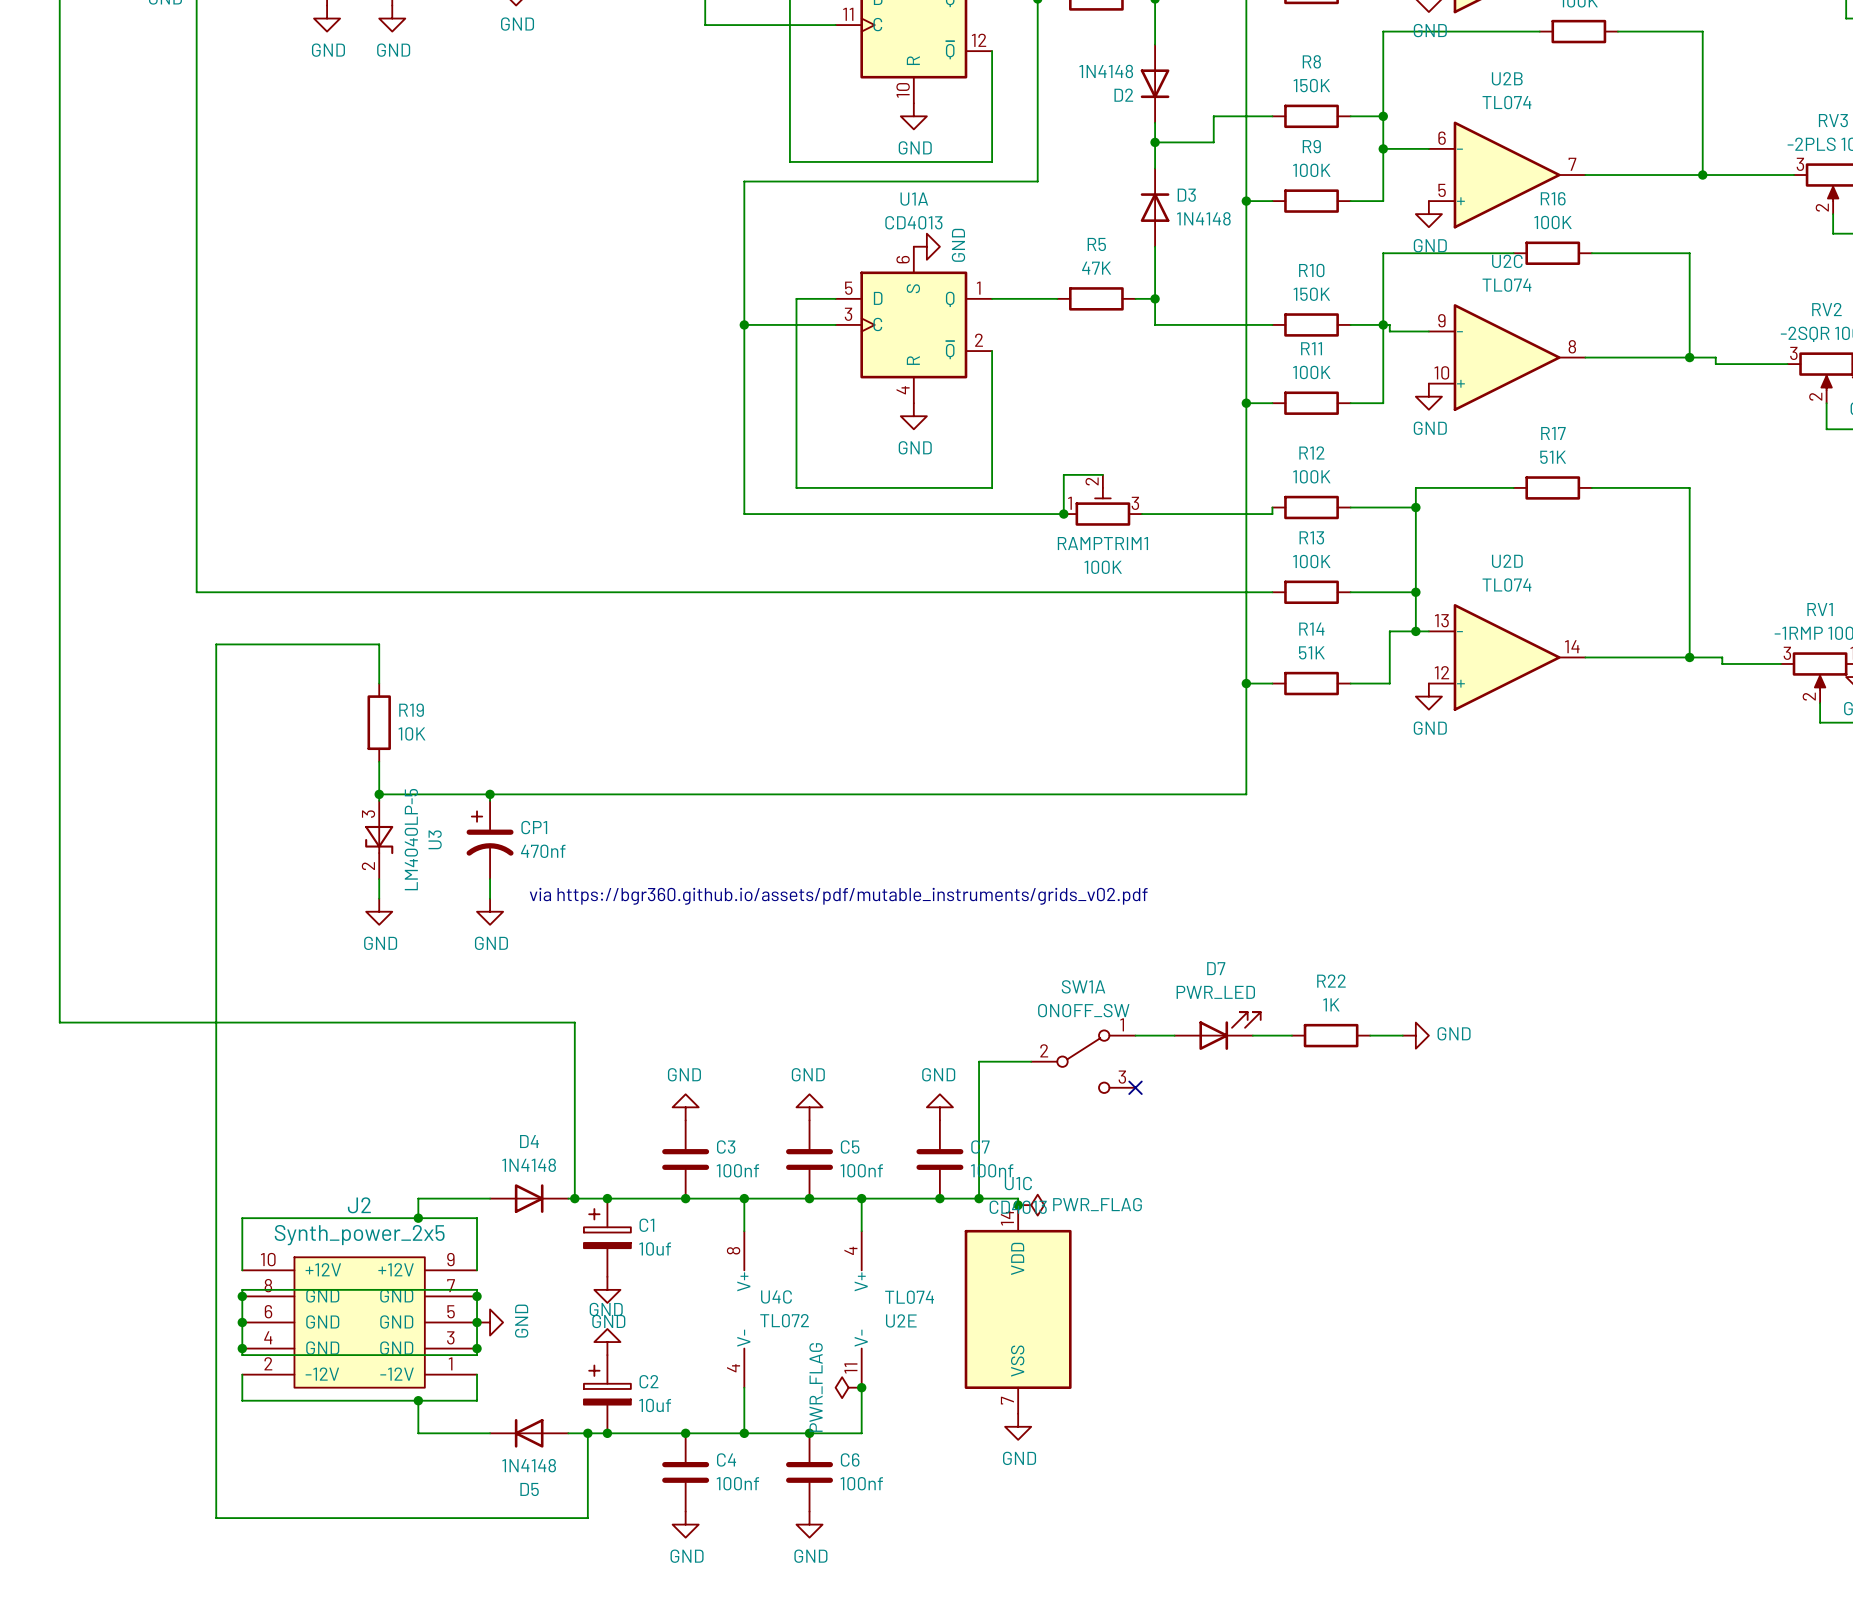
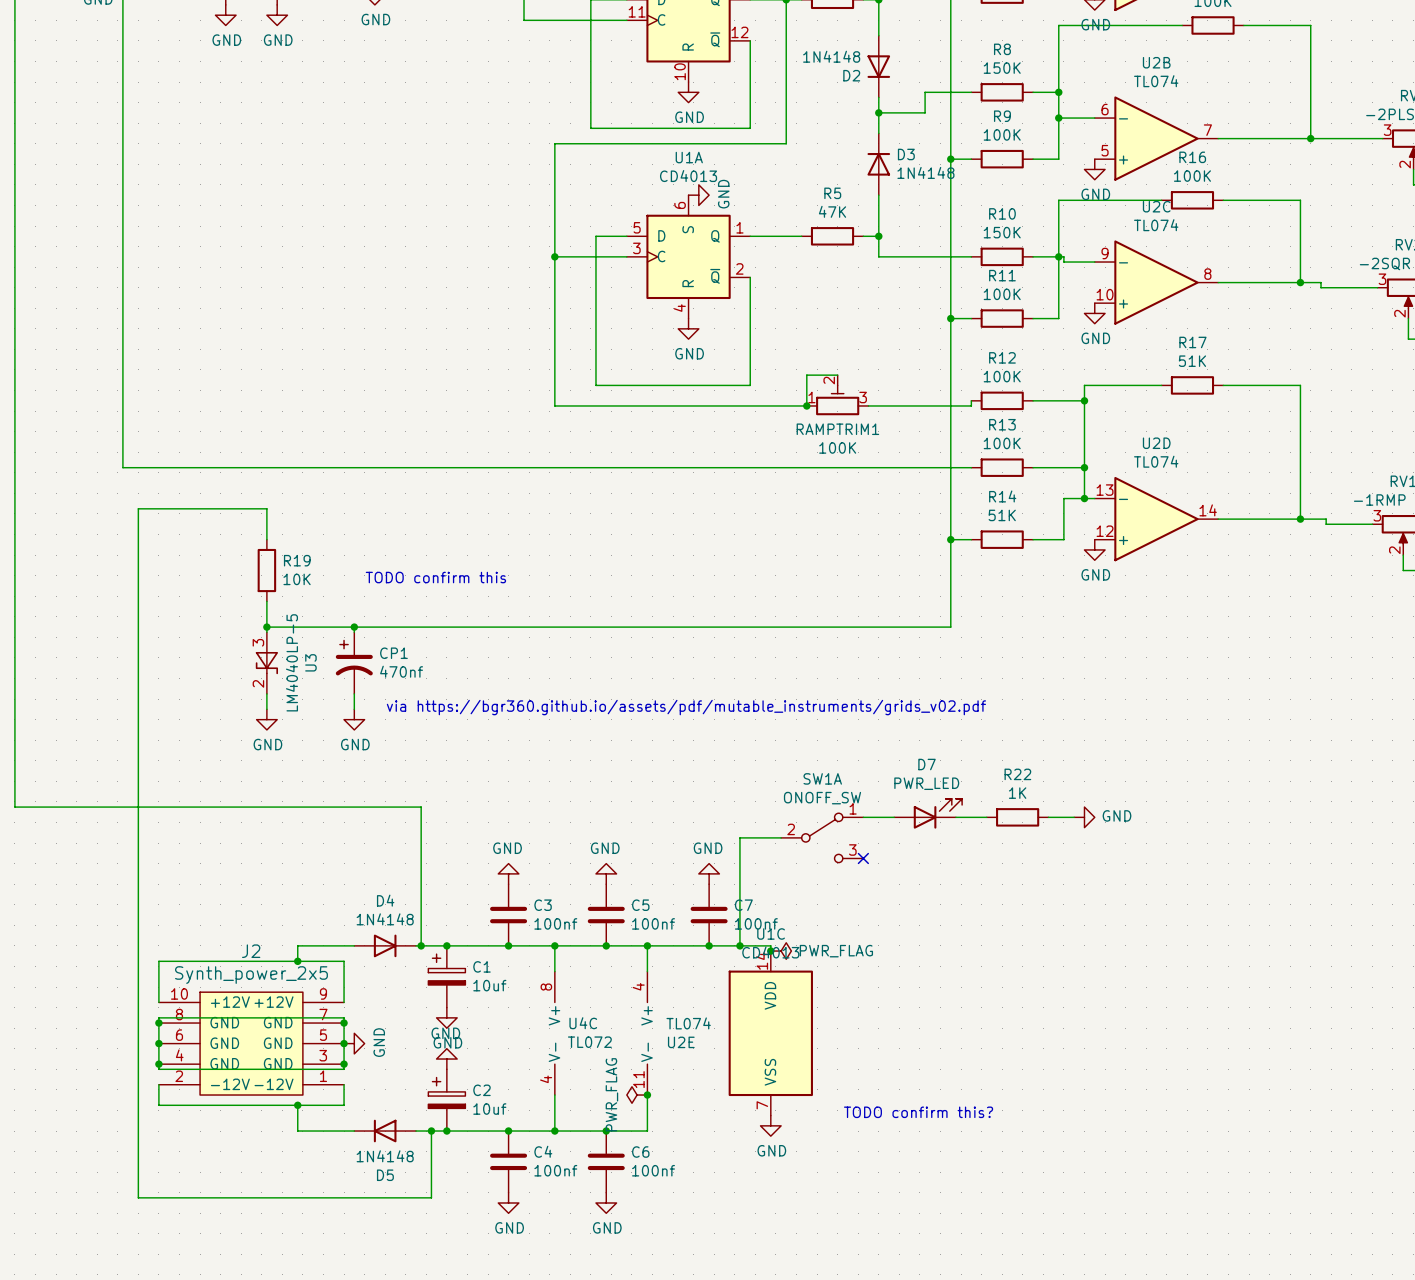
text: none -> TODO confirm this (435, 577)
text: none -> TODO confirm this? (918, 1112)

